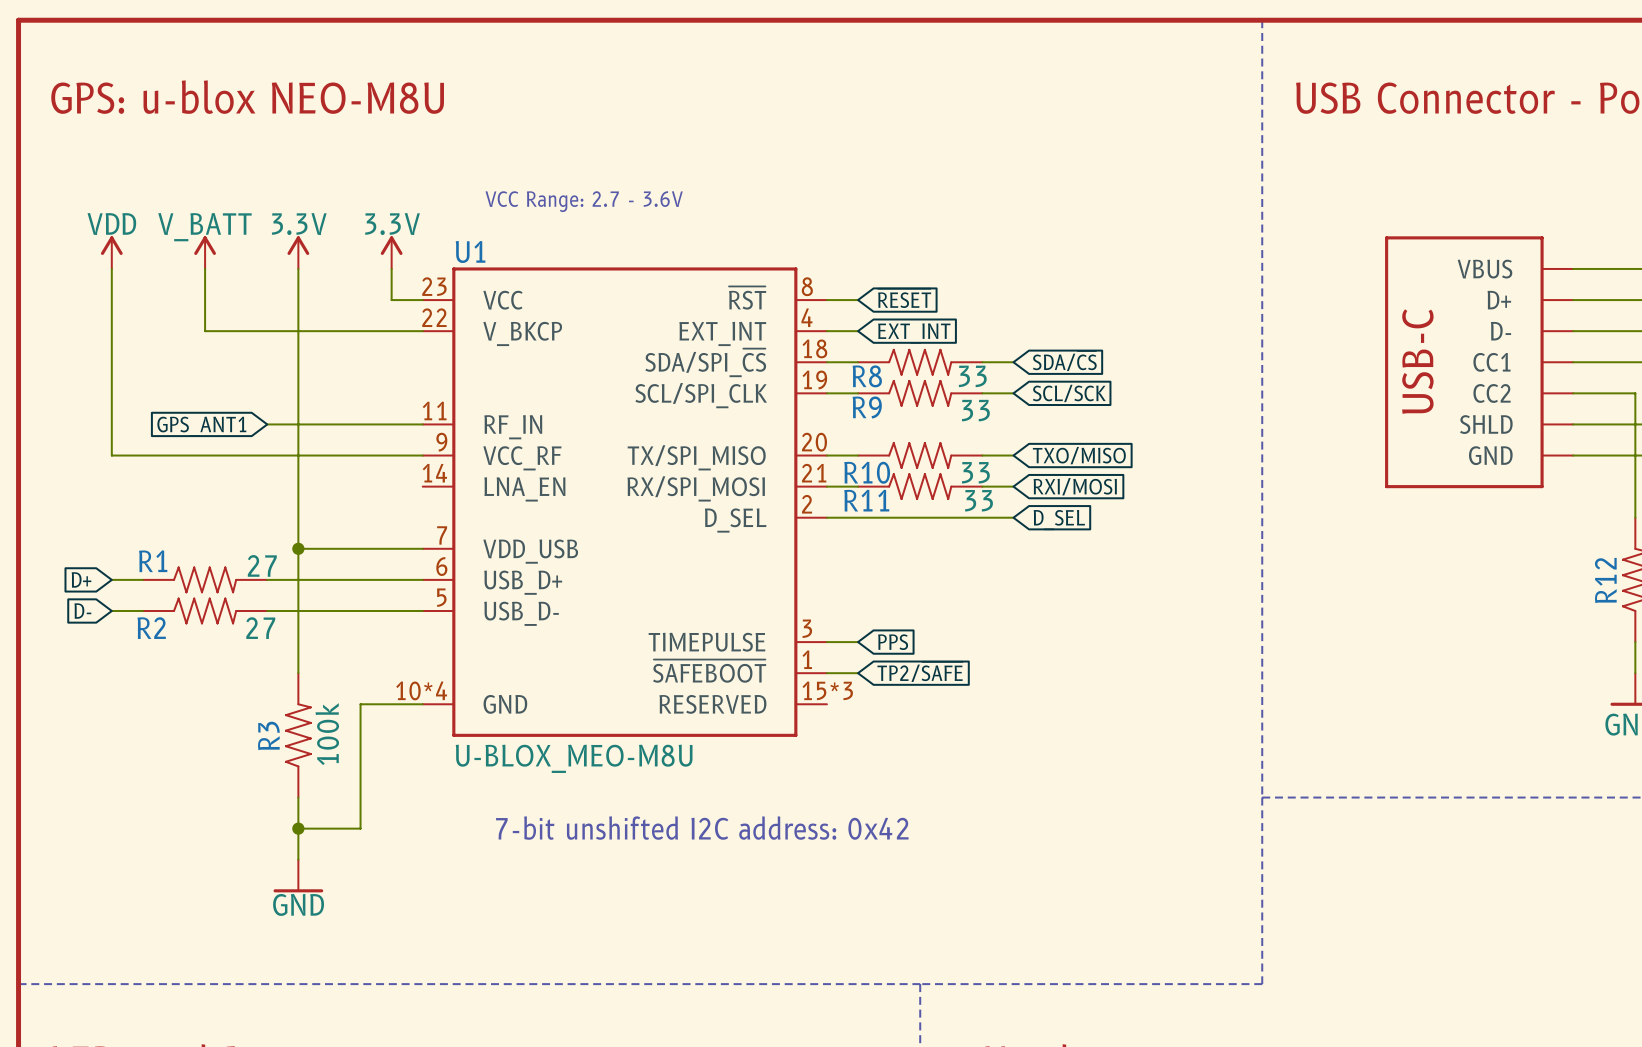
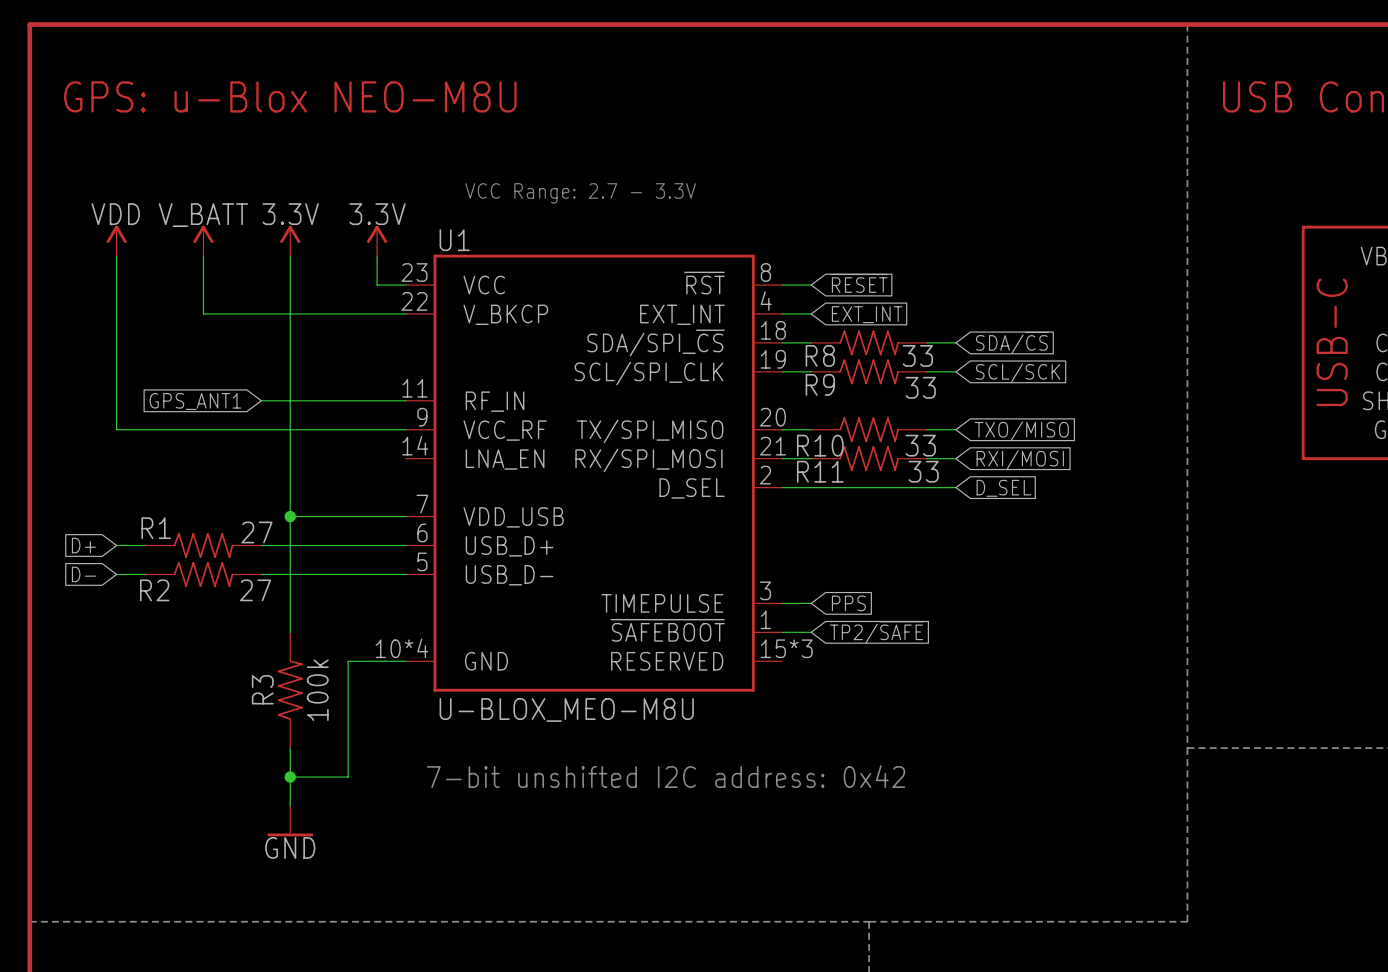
text: GPS: u-blox NEO-M8U (247, 97) -> GPS: u-Blox NEO-M8U (290, 96)
text: VCC Range: 2.7 - 3.6V (584, 201) -> VCC Range: 2.7 - 3.3V (580, 193)

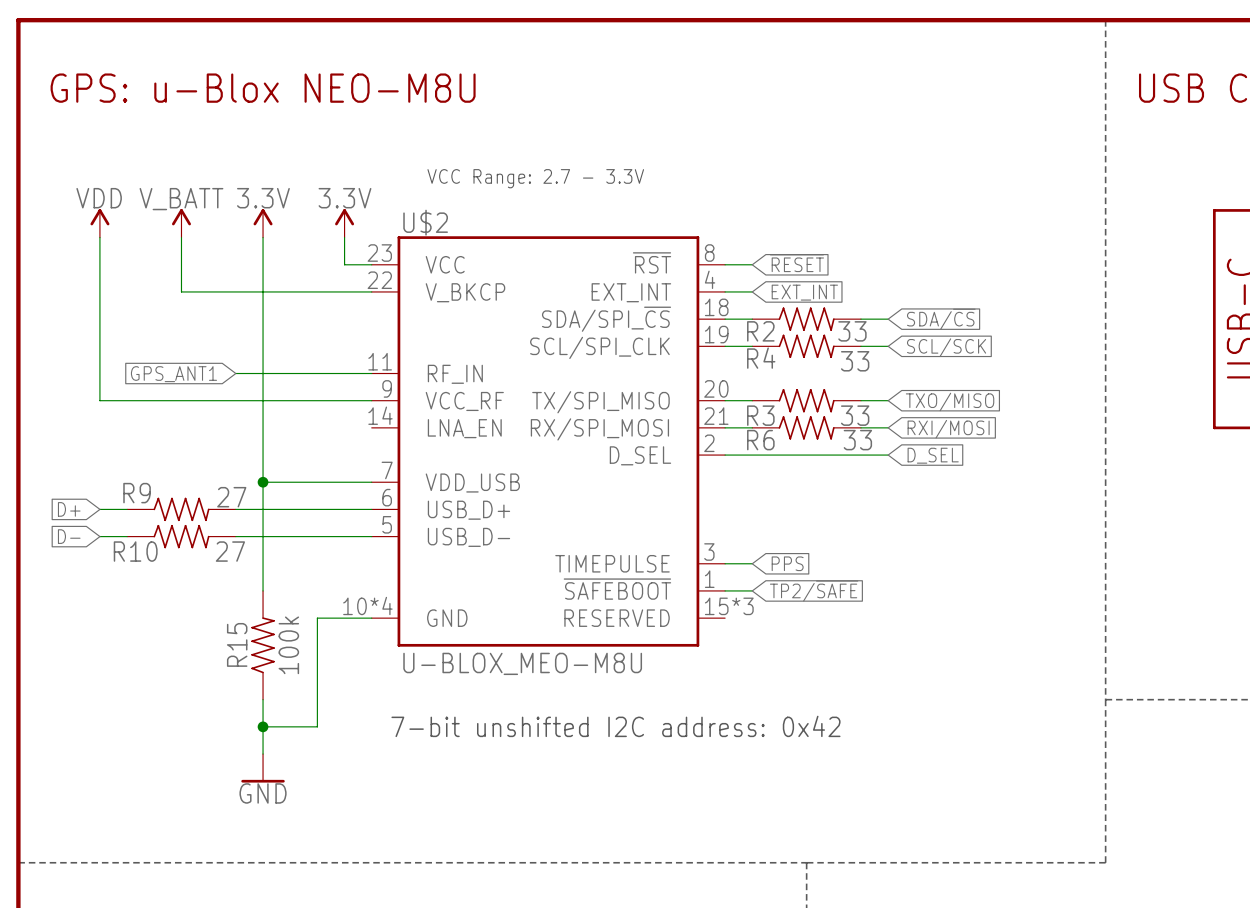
U1 name: U1 (454, 240) -> U$2 (425, 222)
R8 name: R8 (820, 355) -> R2 (760, 331)
R9 name: R9 (820, 384) -> R4 (761, 358)
R10 name: R10 (820, 445) -> R3 (760, 415)
R11 name: R11 (820, 471) -> R6 (760, 440)
R1 name: R1 (156, 528) -> R9 (137, 493)
R2 name: R2 (154, 590) -> R10 (135, 551)
R3 name: R3 (262, 689) -> R15 (237, 644)

